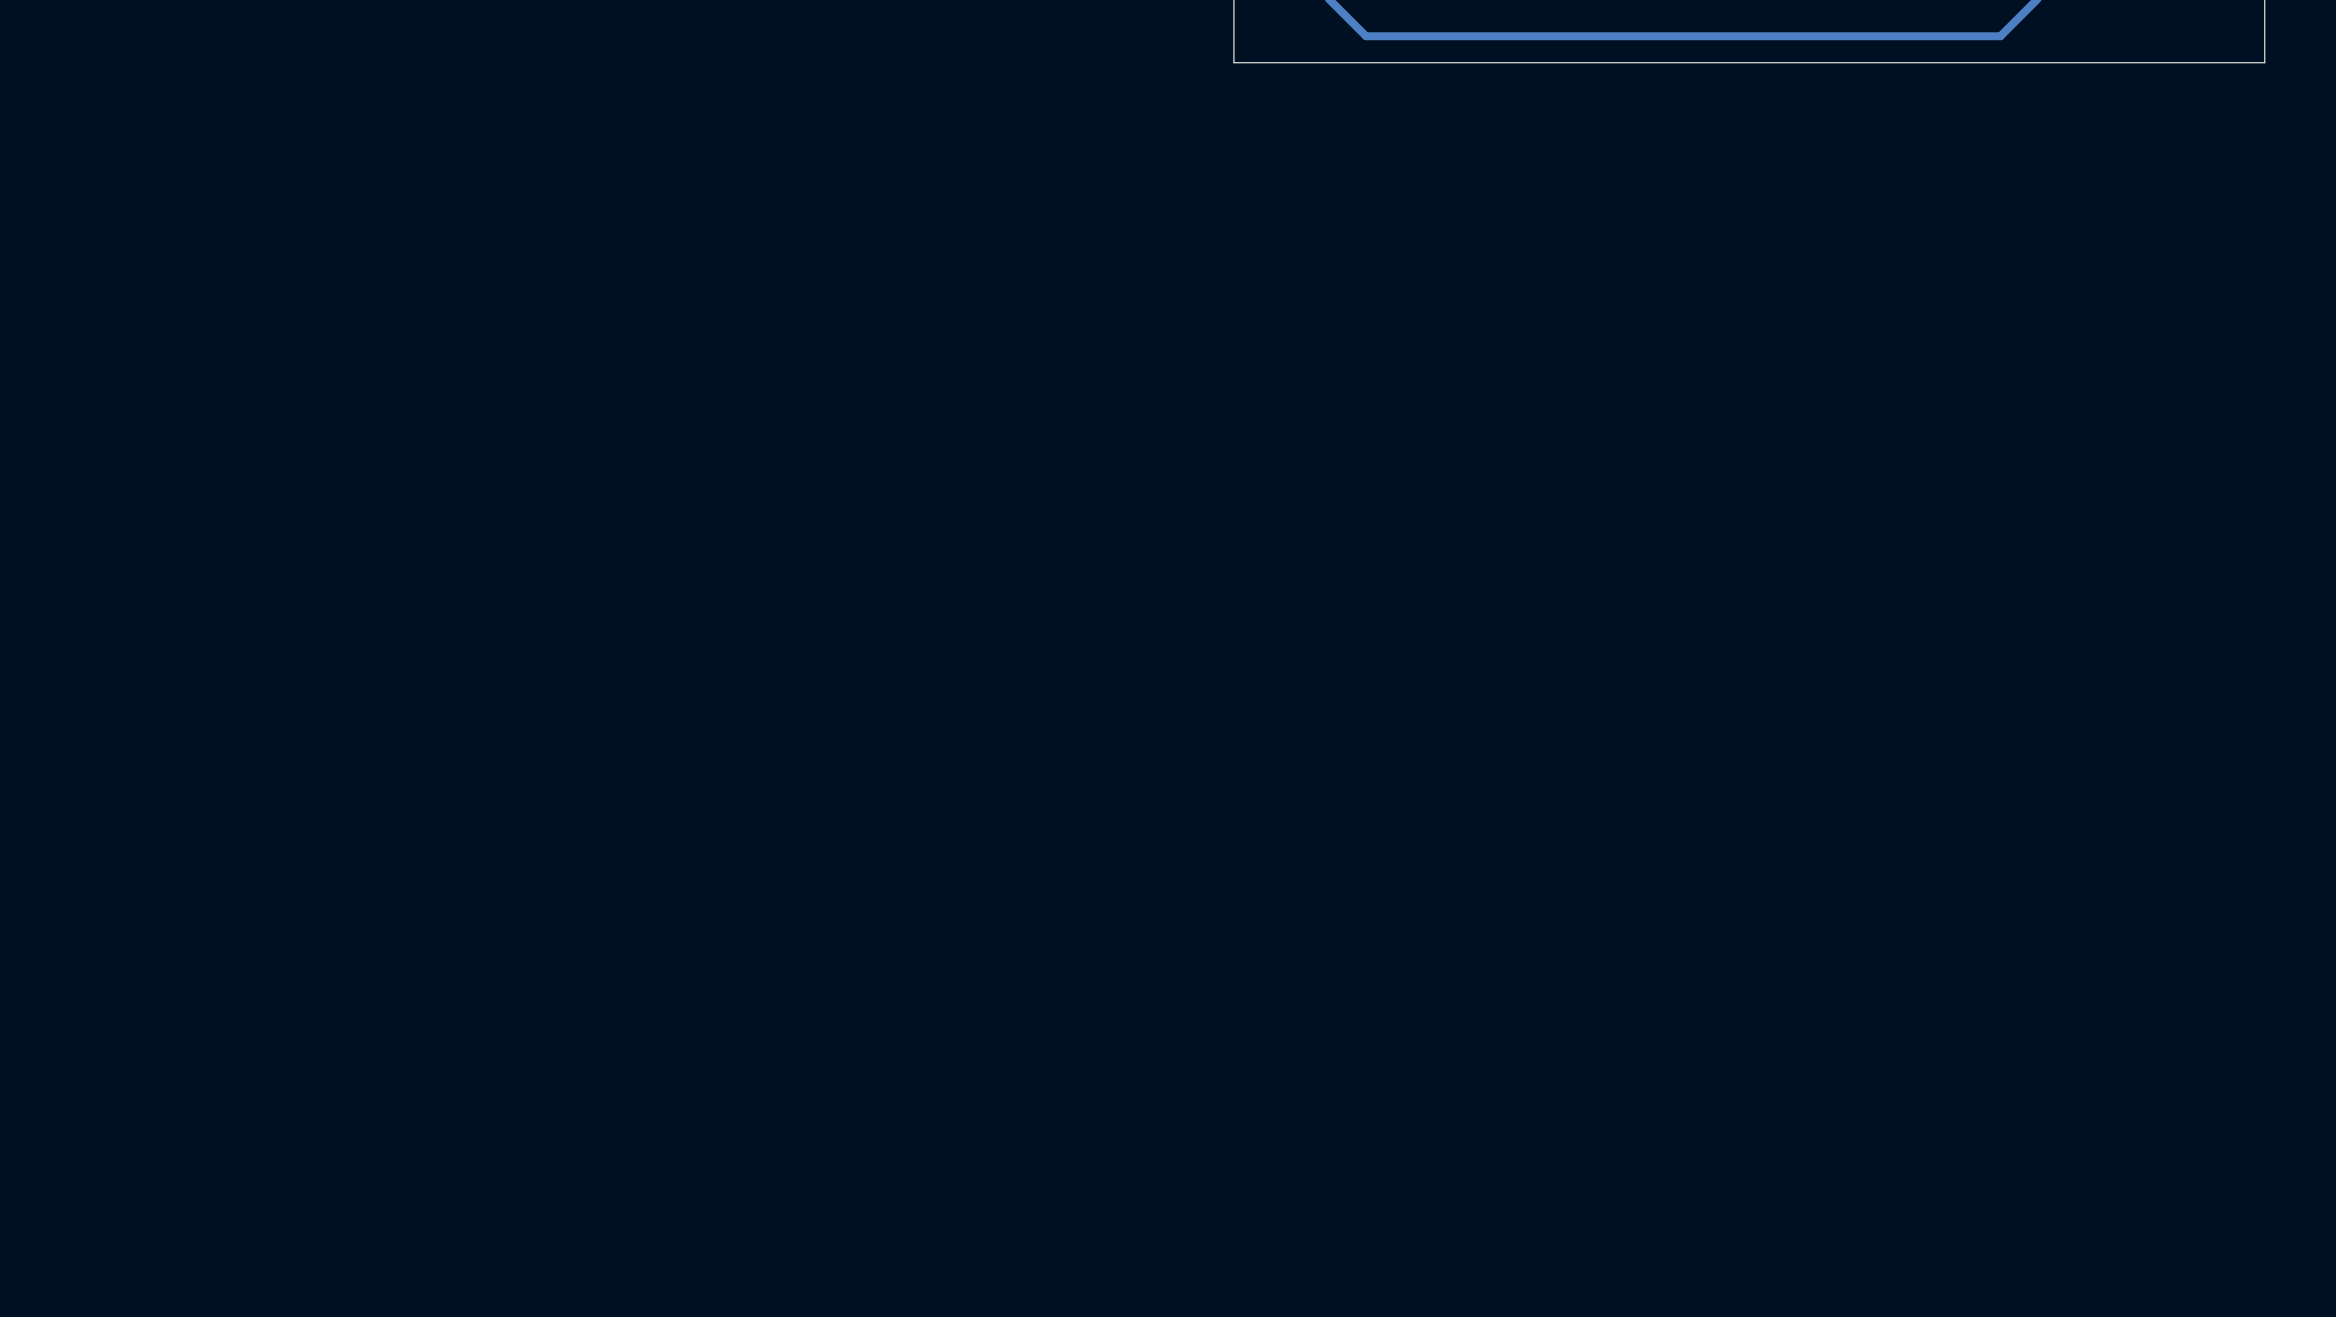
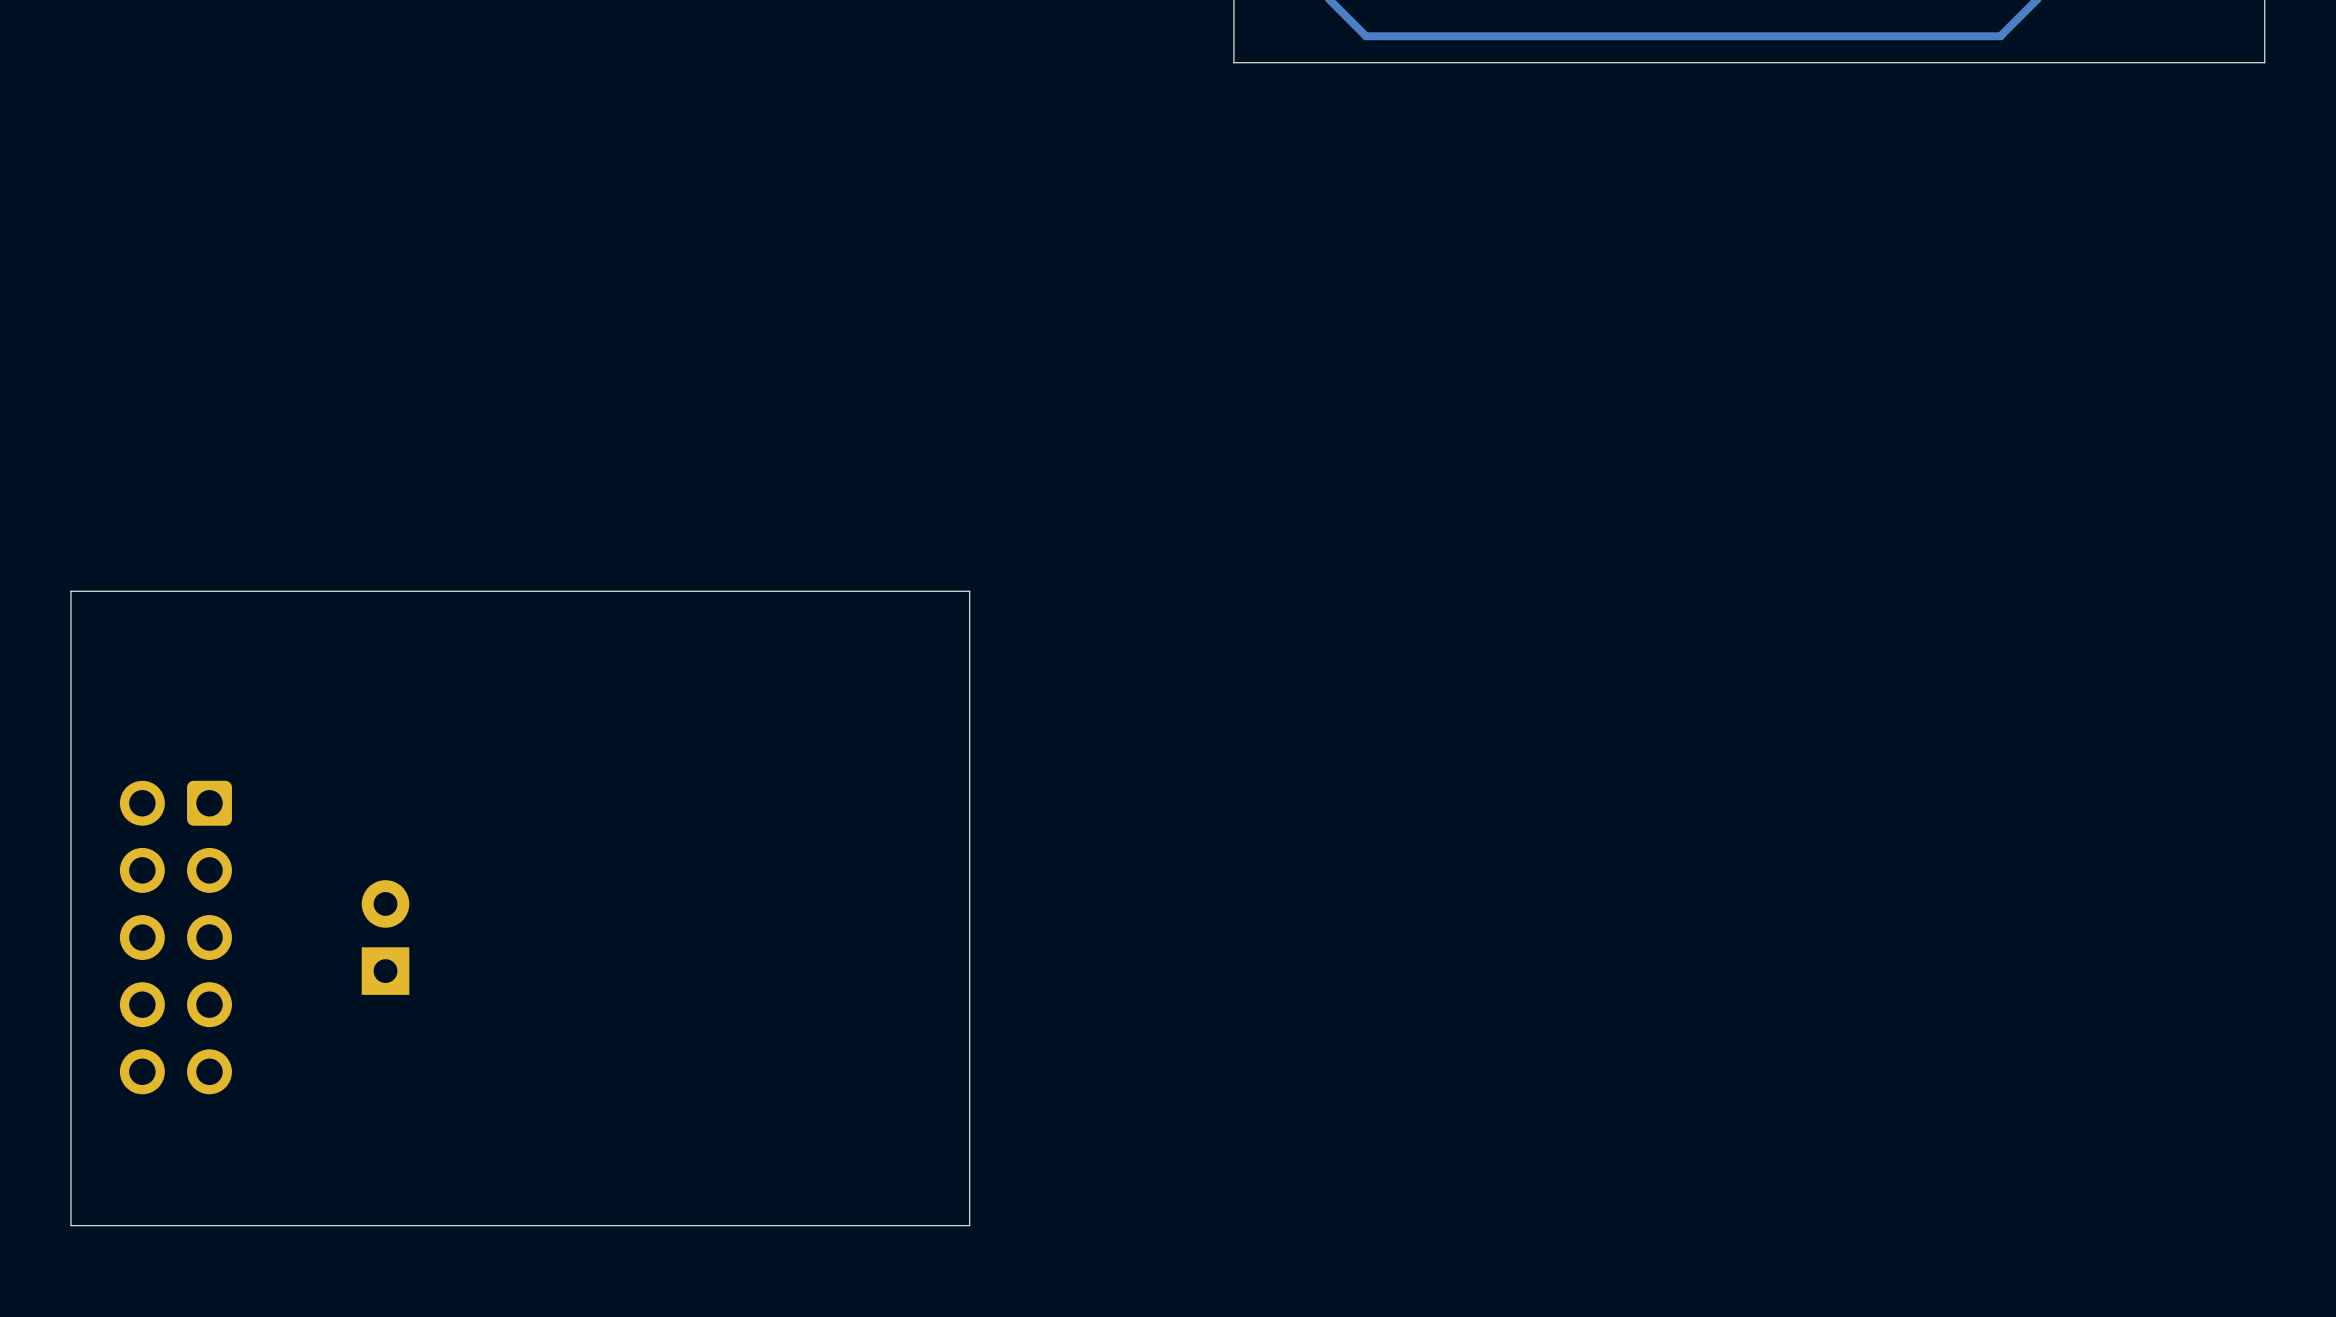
board edge: none -> (969, 591) (71, 591) (71, 1225) (969, 1225) (969, 591)
part: none -> (175, 937)
part: none -> (385, 937)

